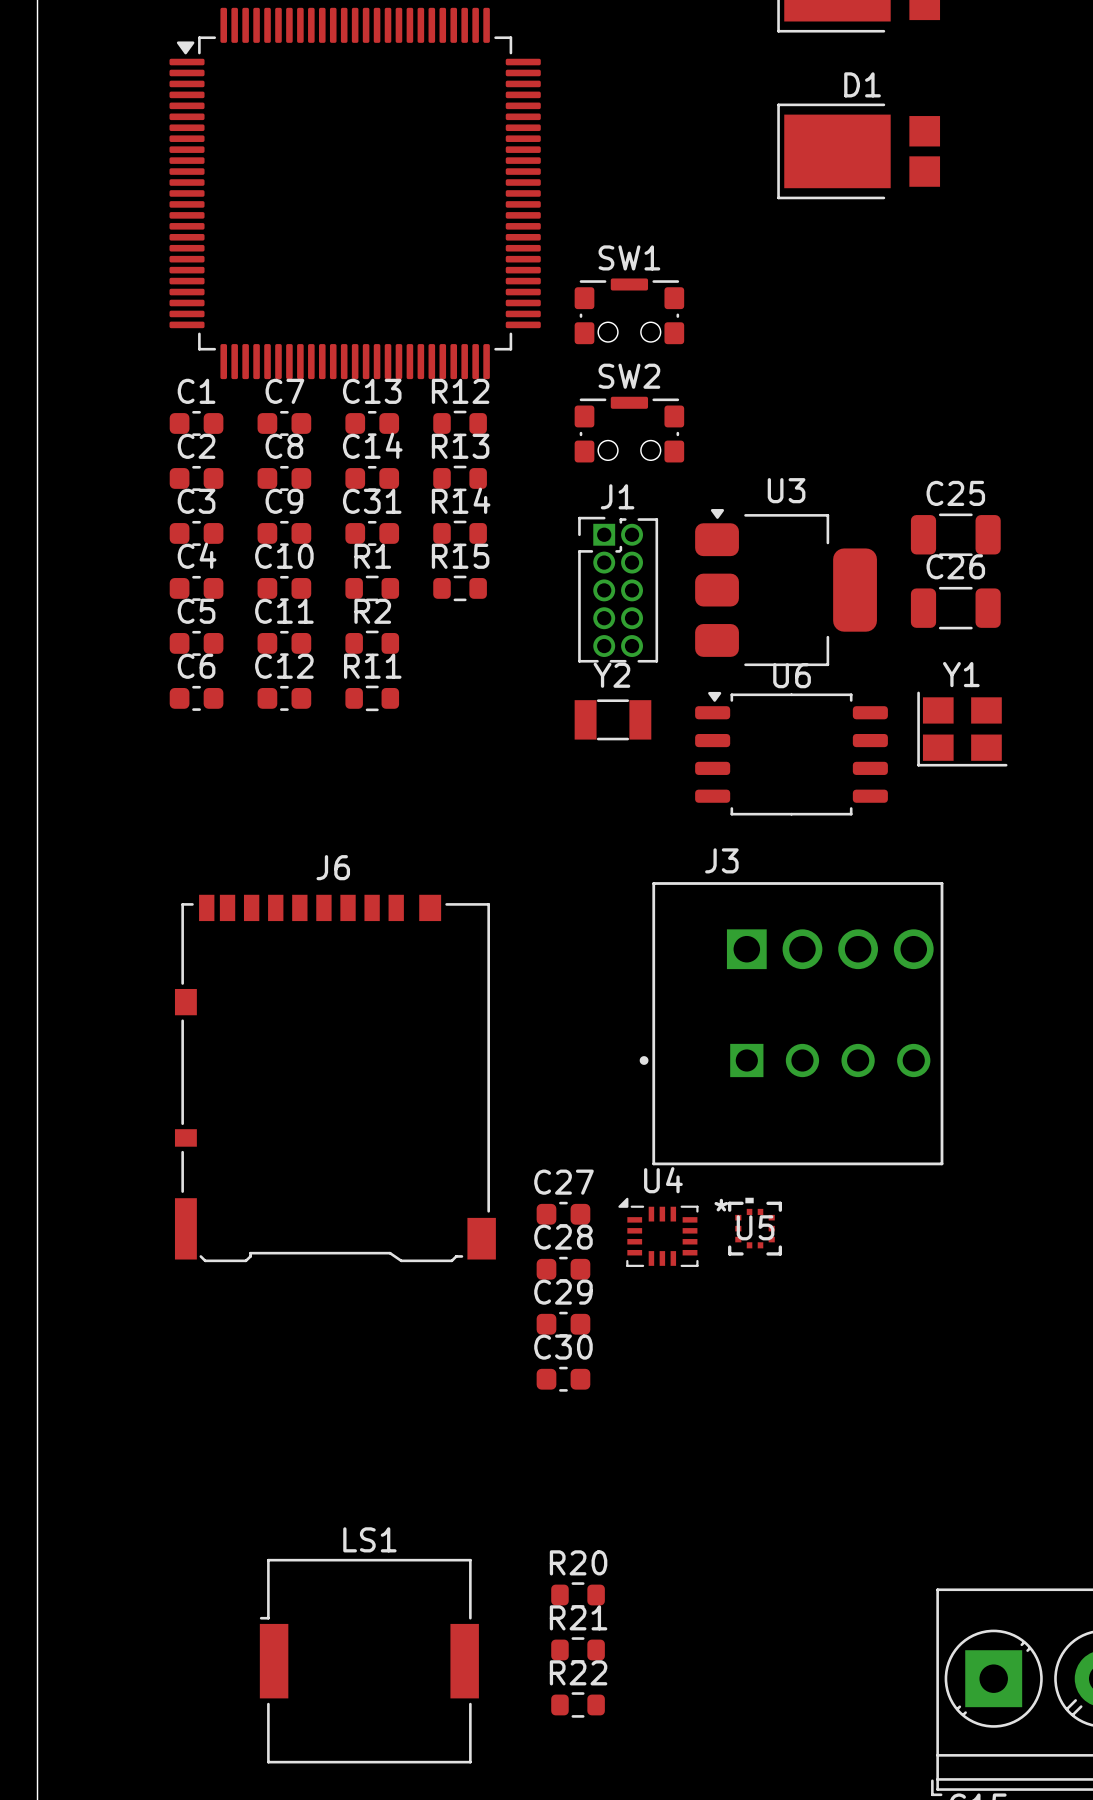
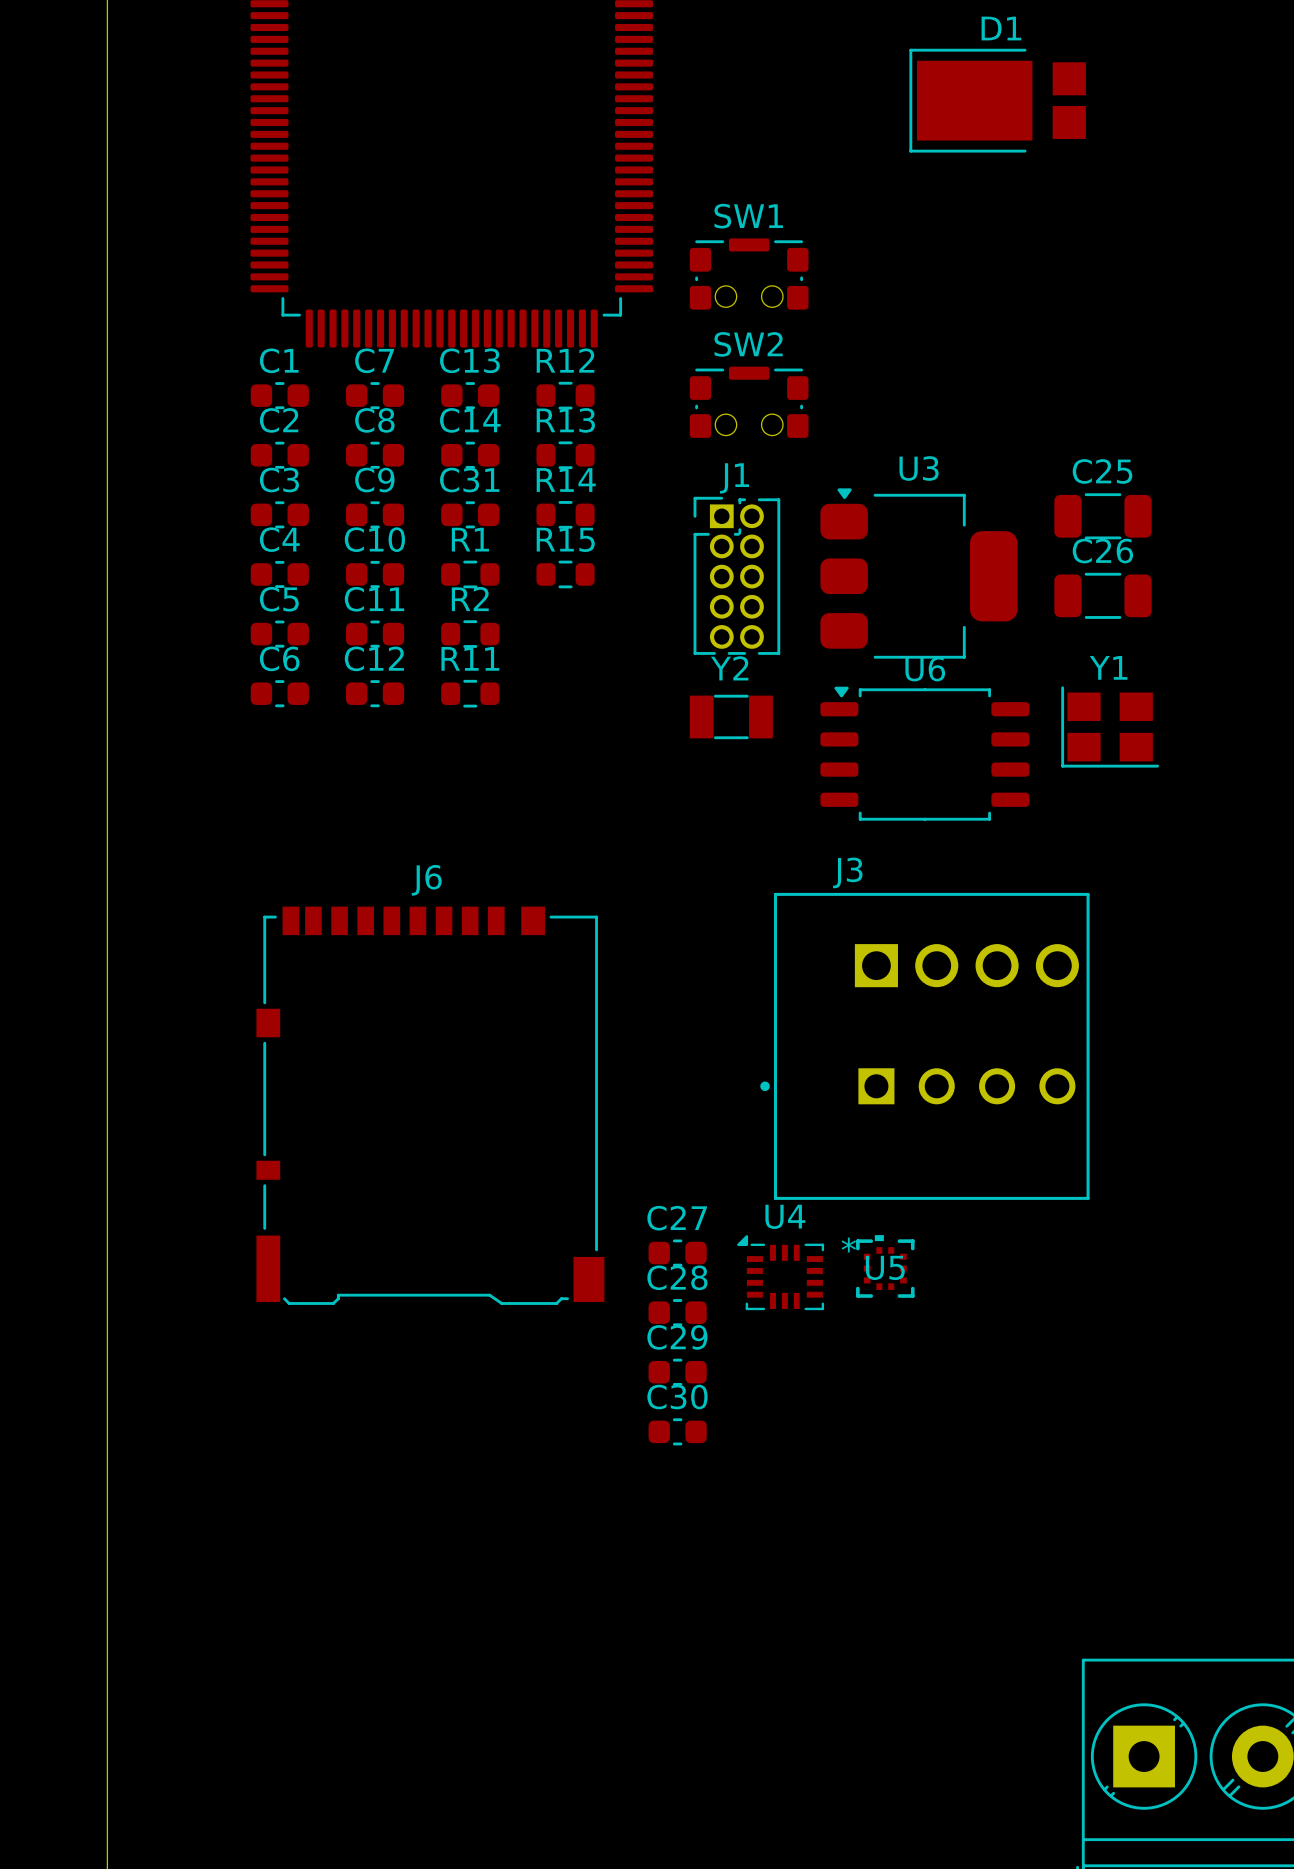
R20: (578, 1595) -> none
R21: (578, 1649) -> none
LS1: (369, 1661) -> none
R22: (578, 1704) -> none

